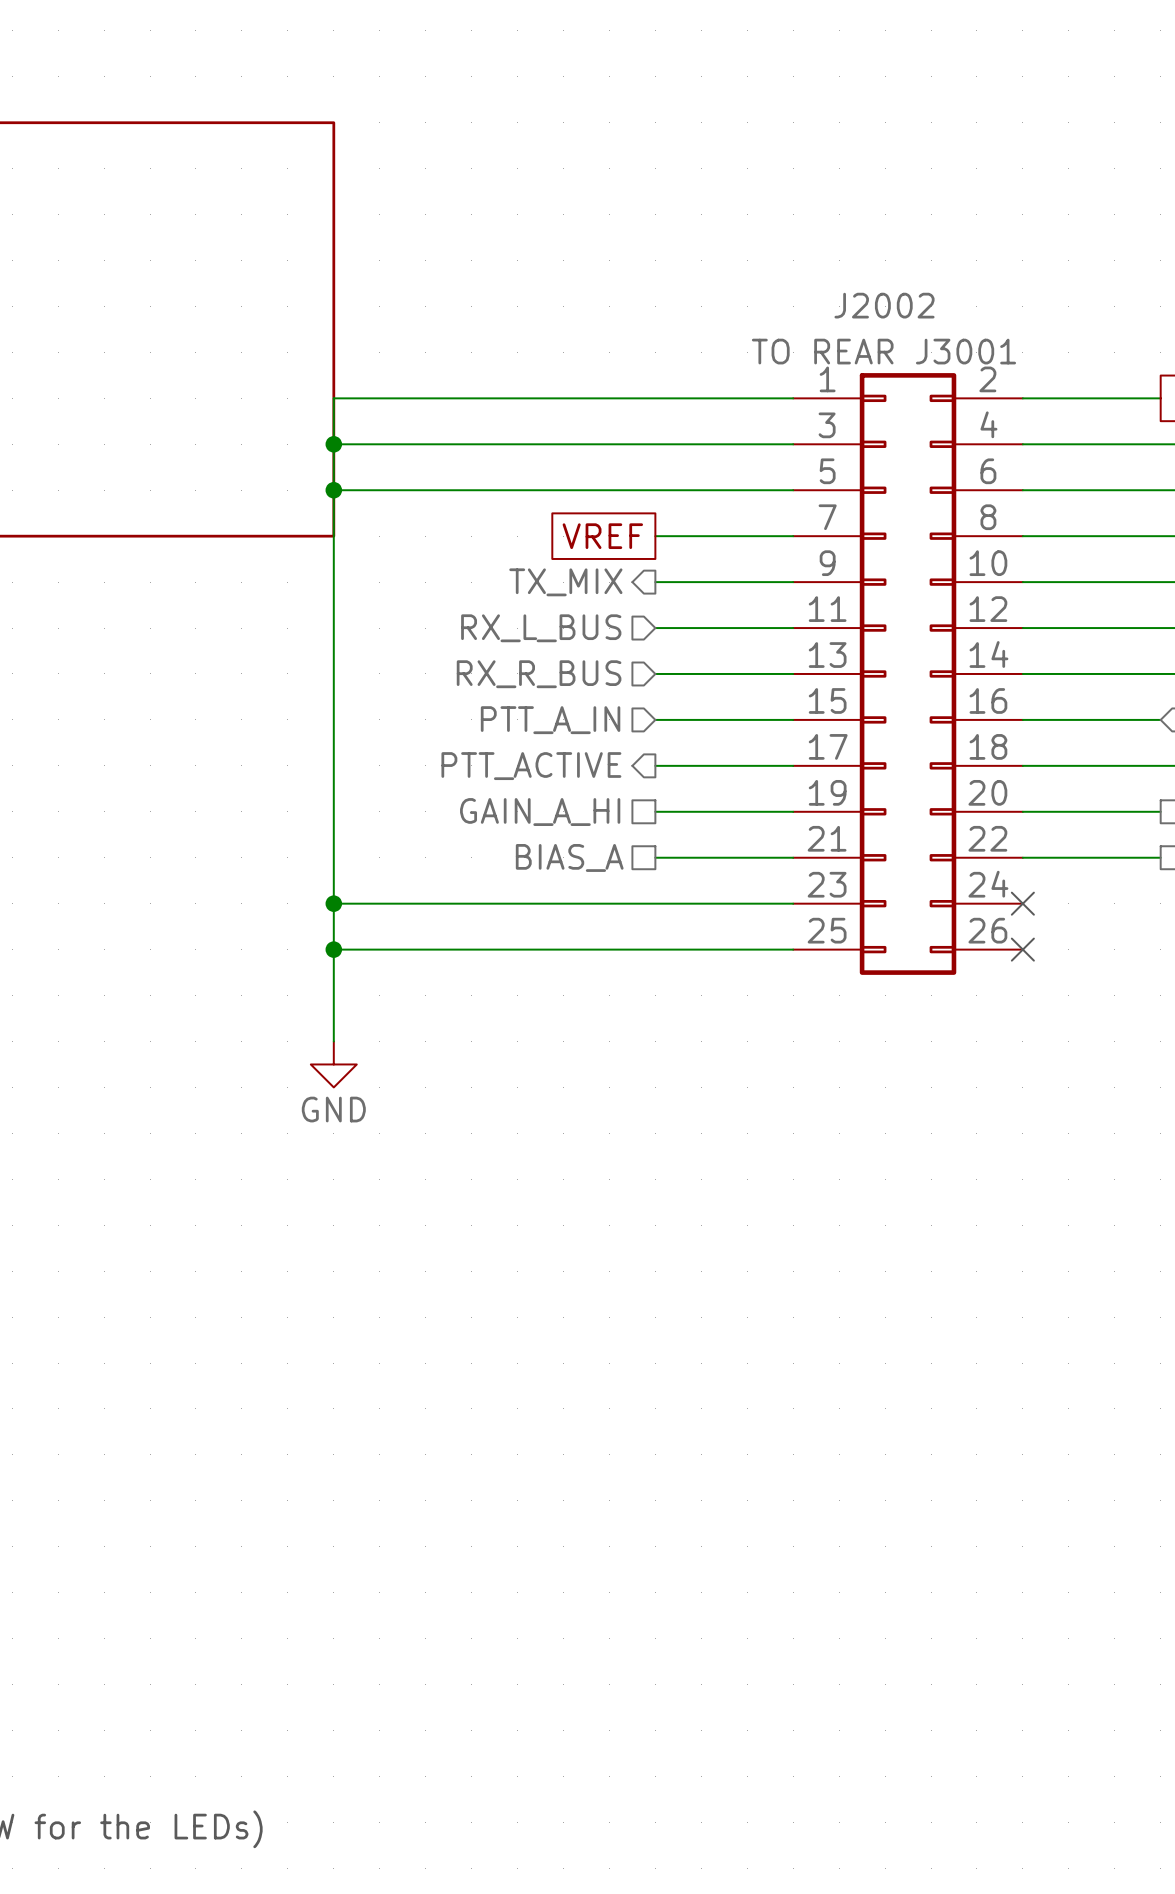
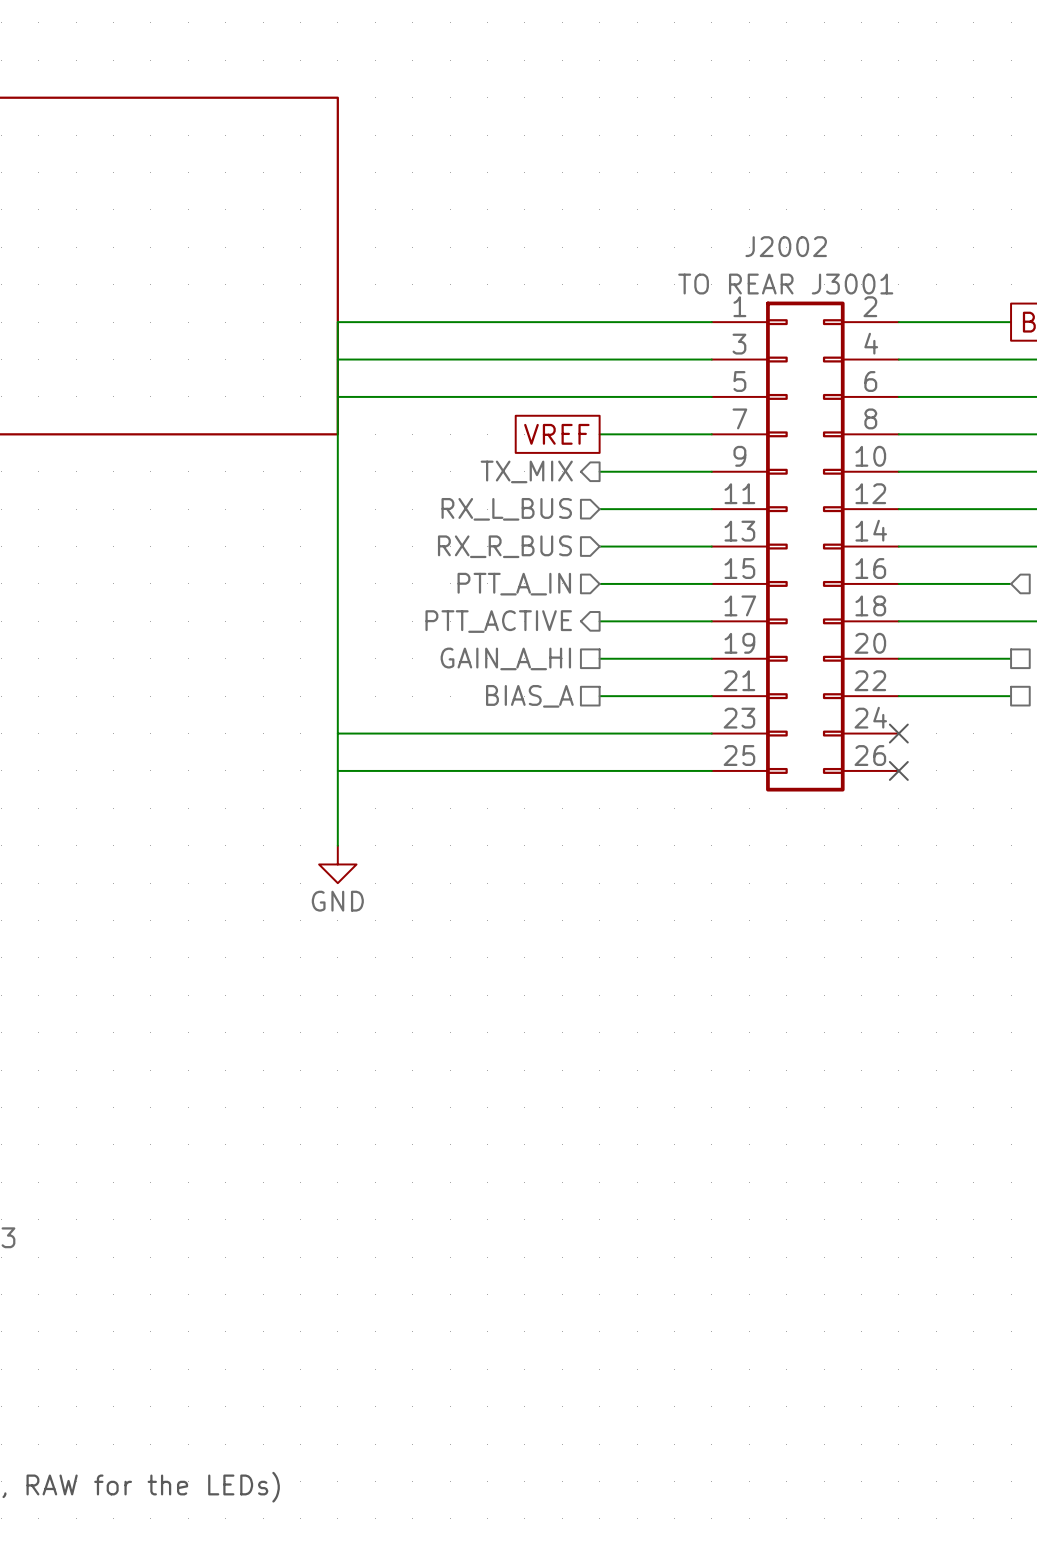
junction: (333, 444) -> none
junction: (333, 490) -> none
junction: (333, 903) -> none
junction: (333, 949) -> none

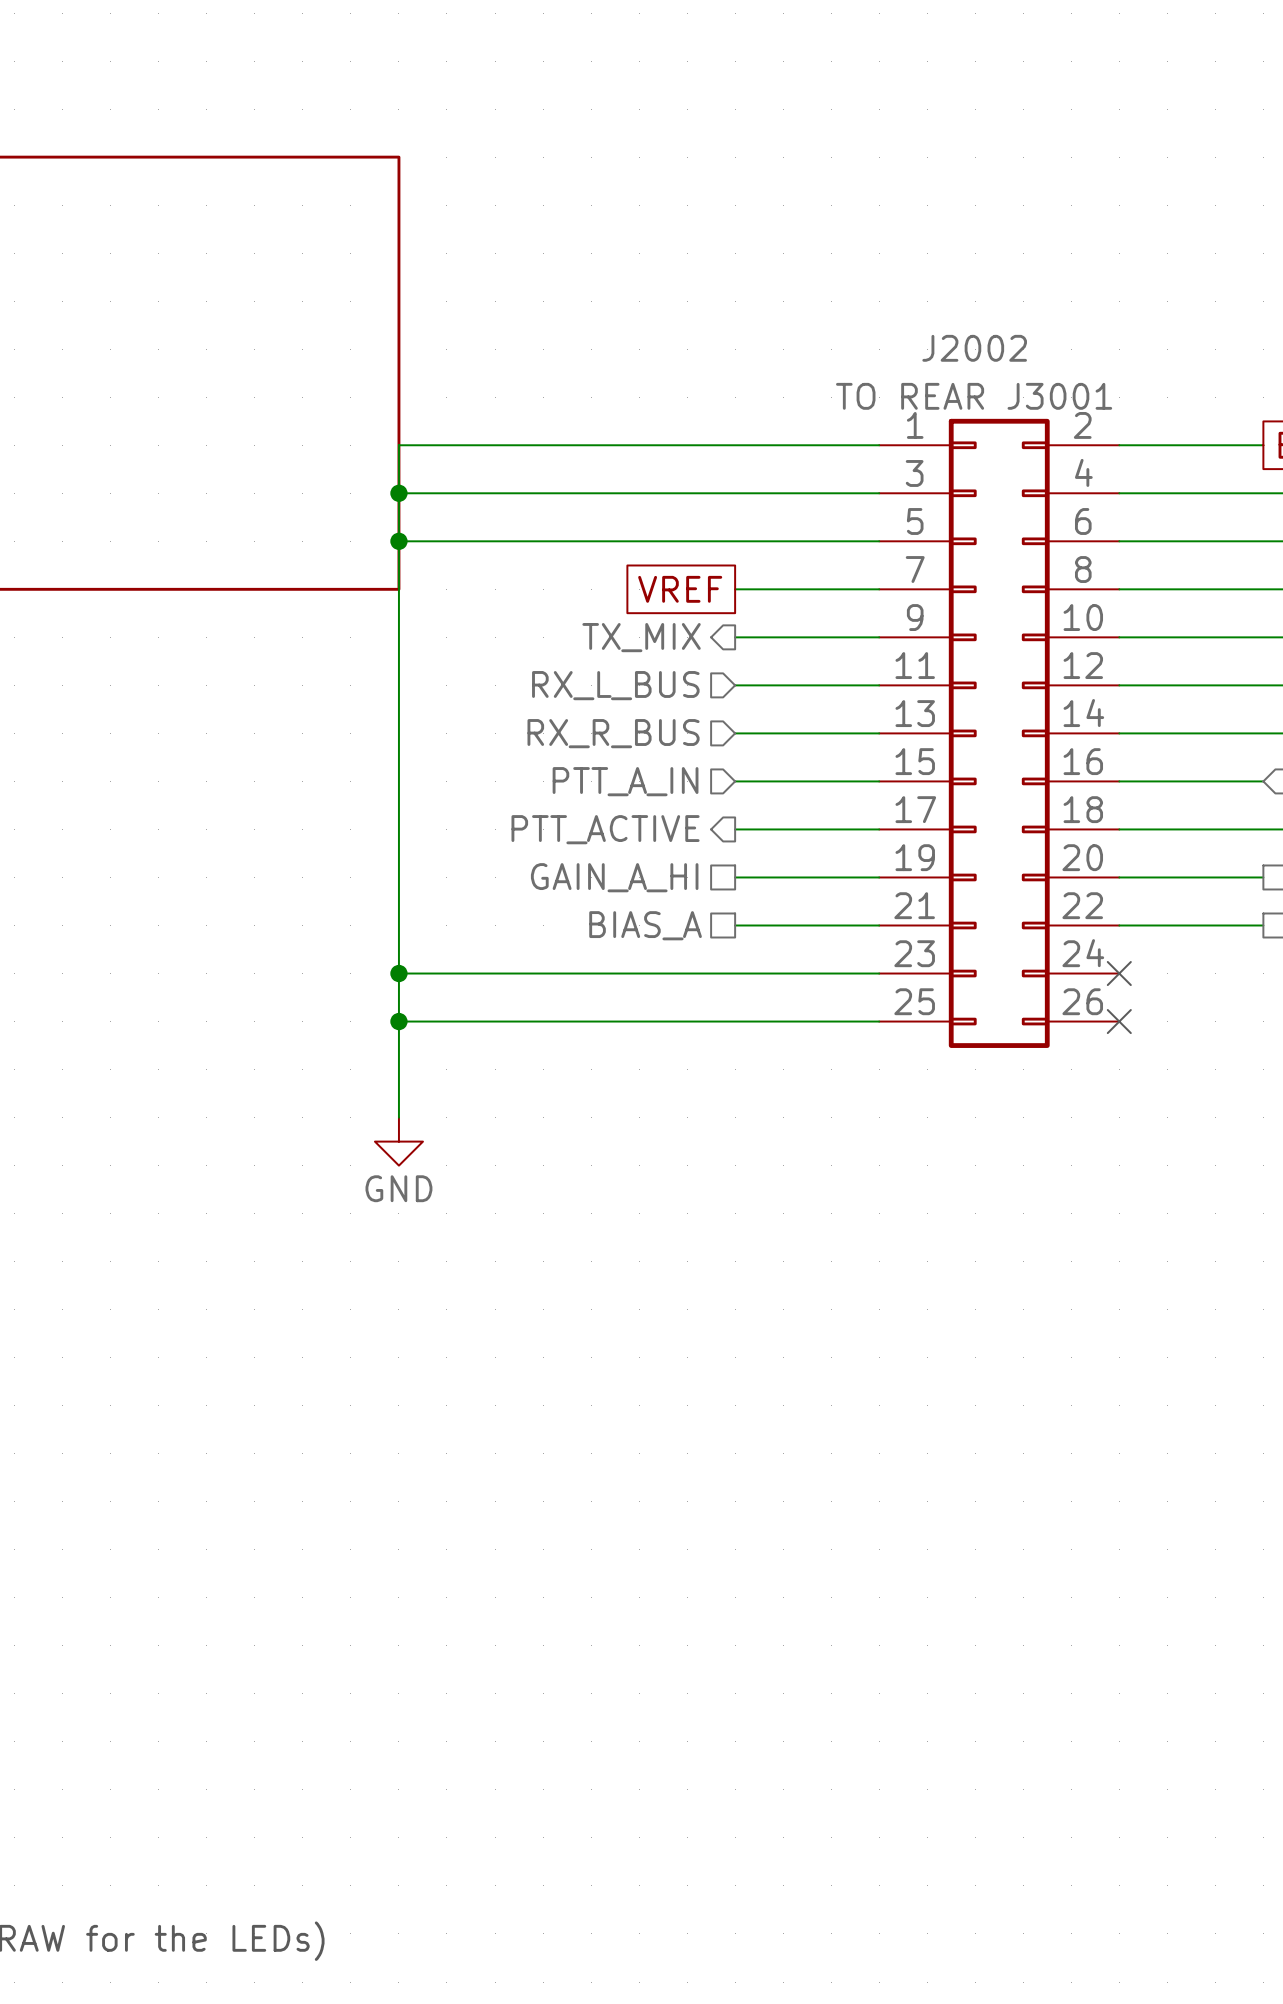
junction: none -> (398, 493)
junction: none -> (398, 541)
junction: none -> (398, 973)
junction: none -> (398, 1021)

